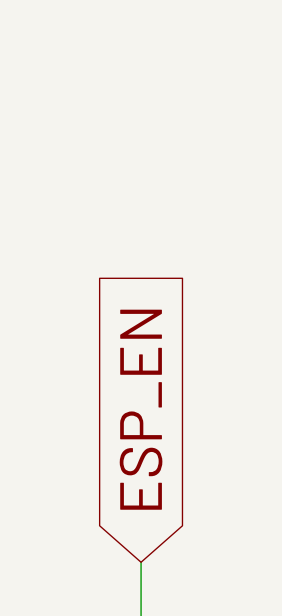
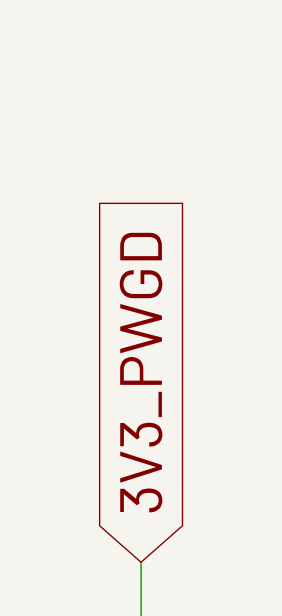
global label: ESP_EN (141, 409) -> 3V3_PWGD (141, 372)

